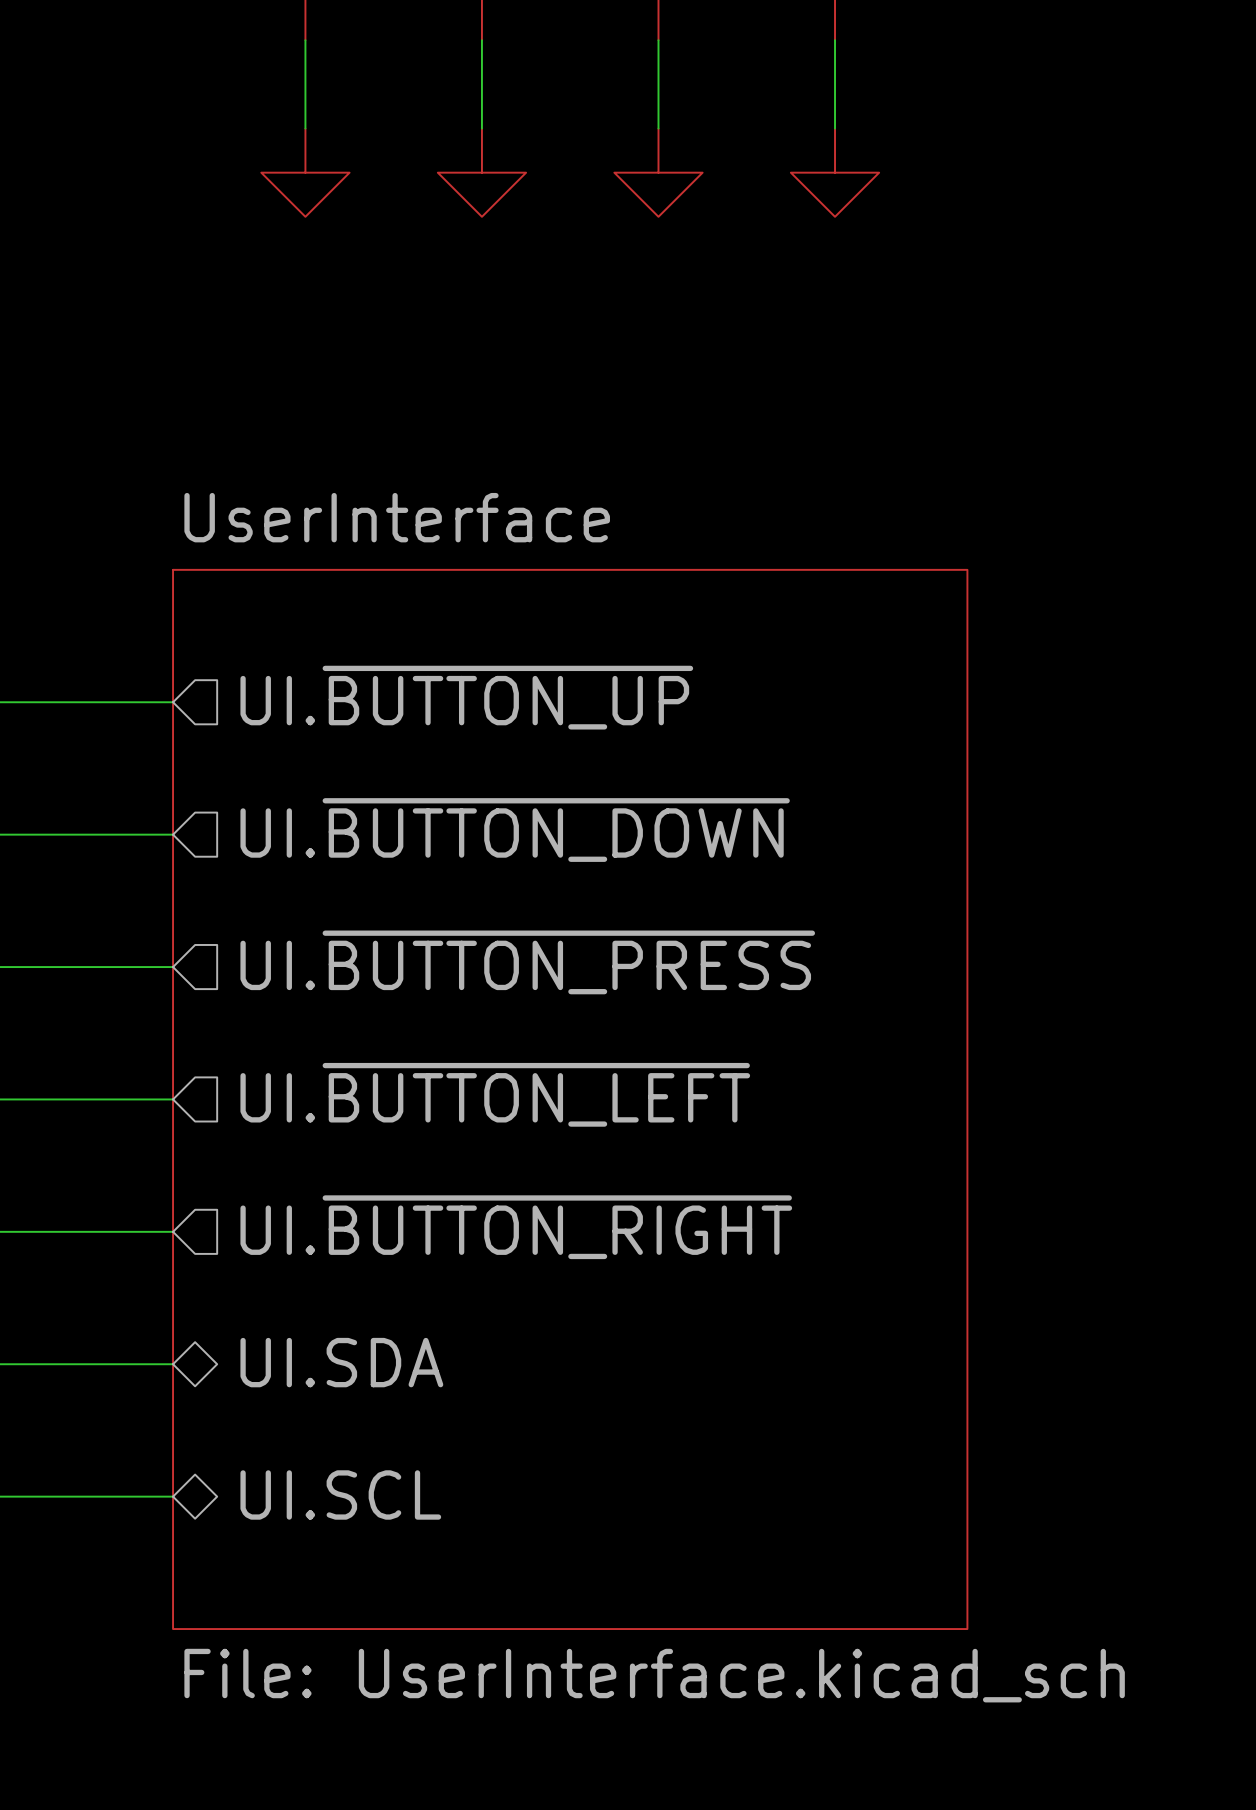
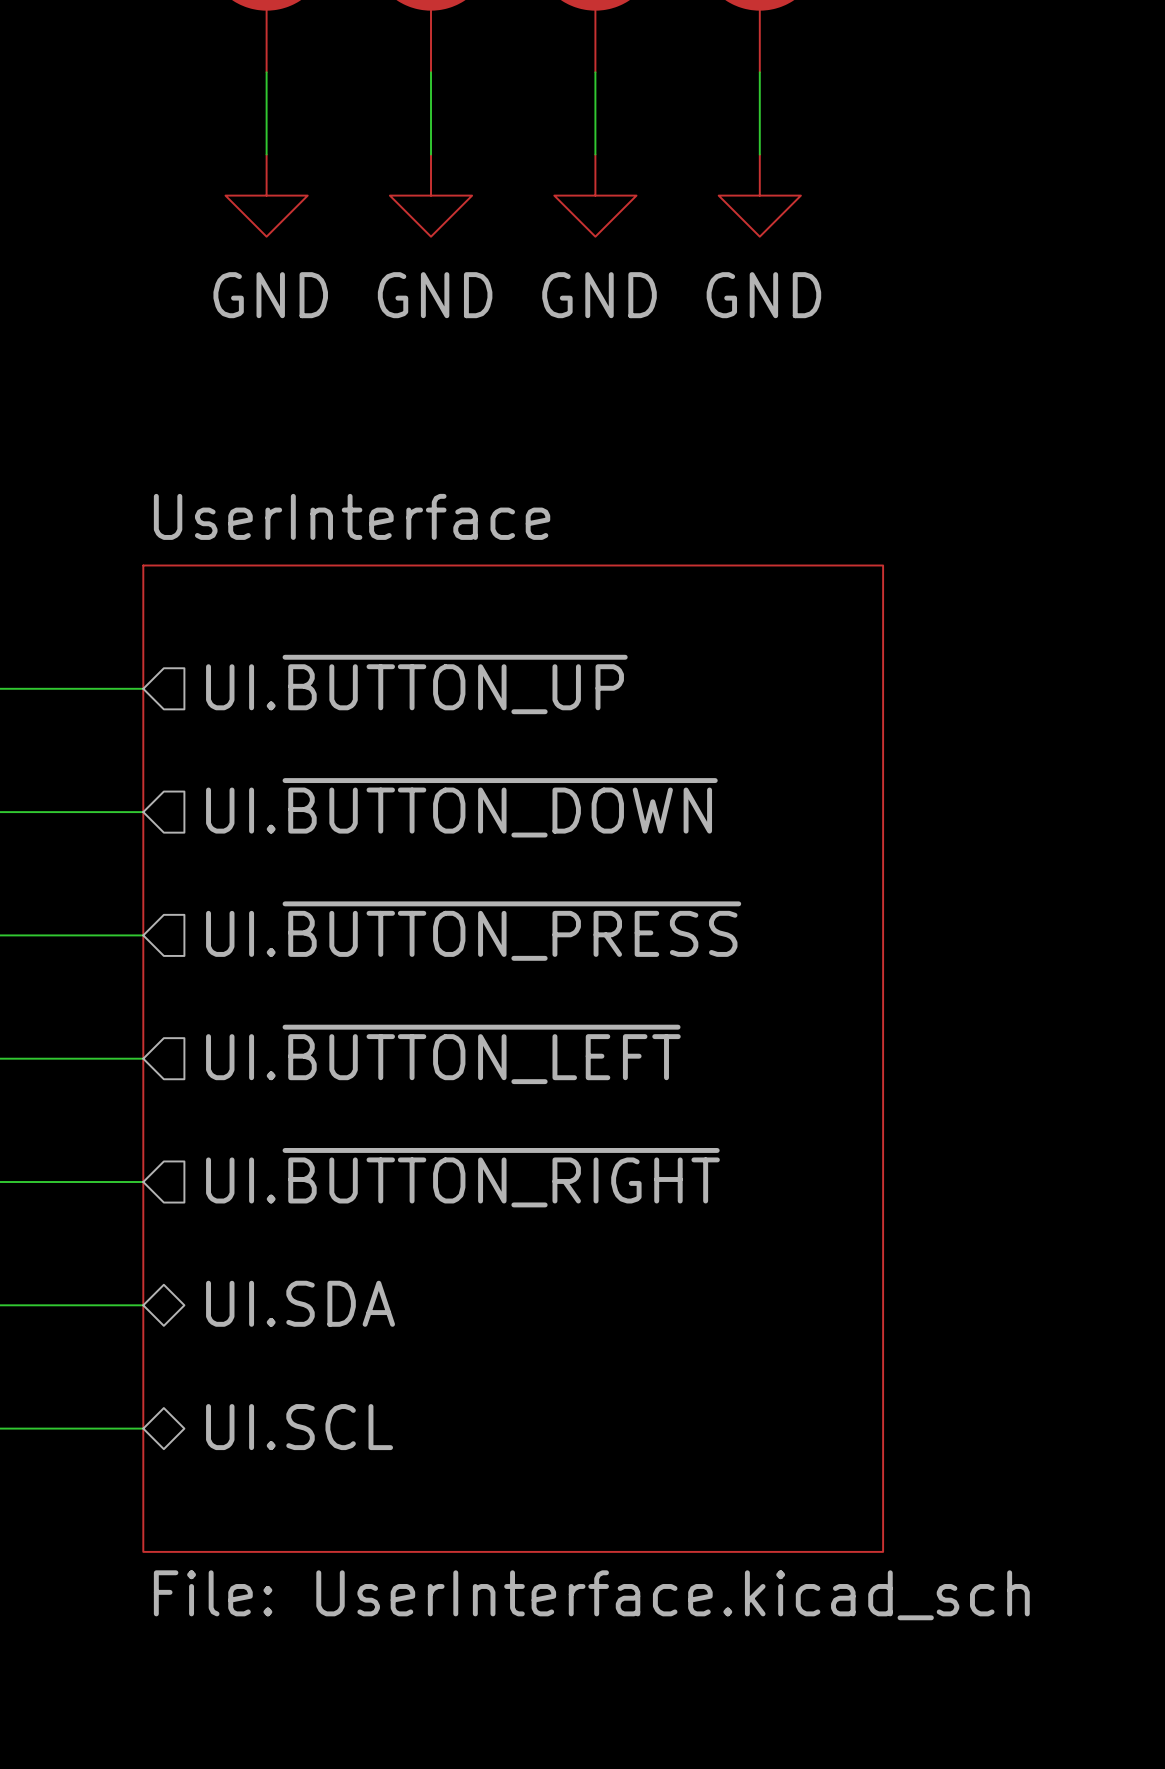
power symbol text: none -> GND (270, 295)
power symbol text: none -> GND (435, 295)
power symbol text: none -> GND (599, 295)
power symbol text: none -> GND (763, 295)

